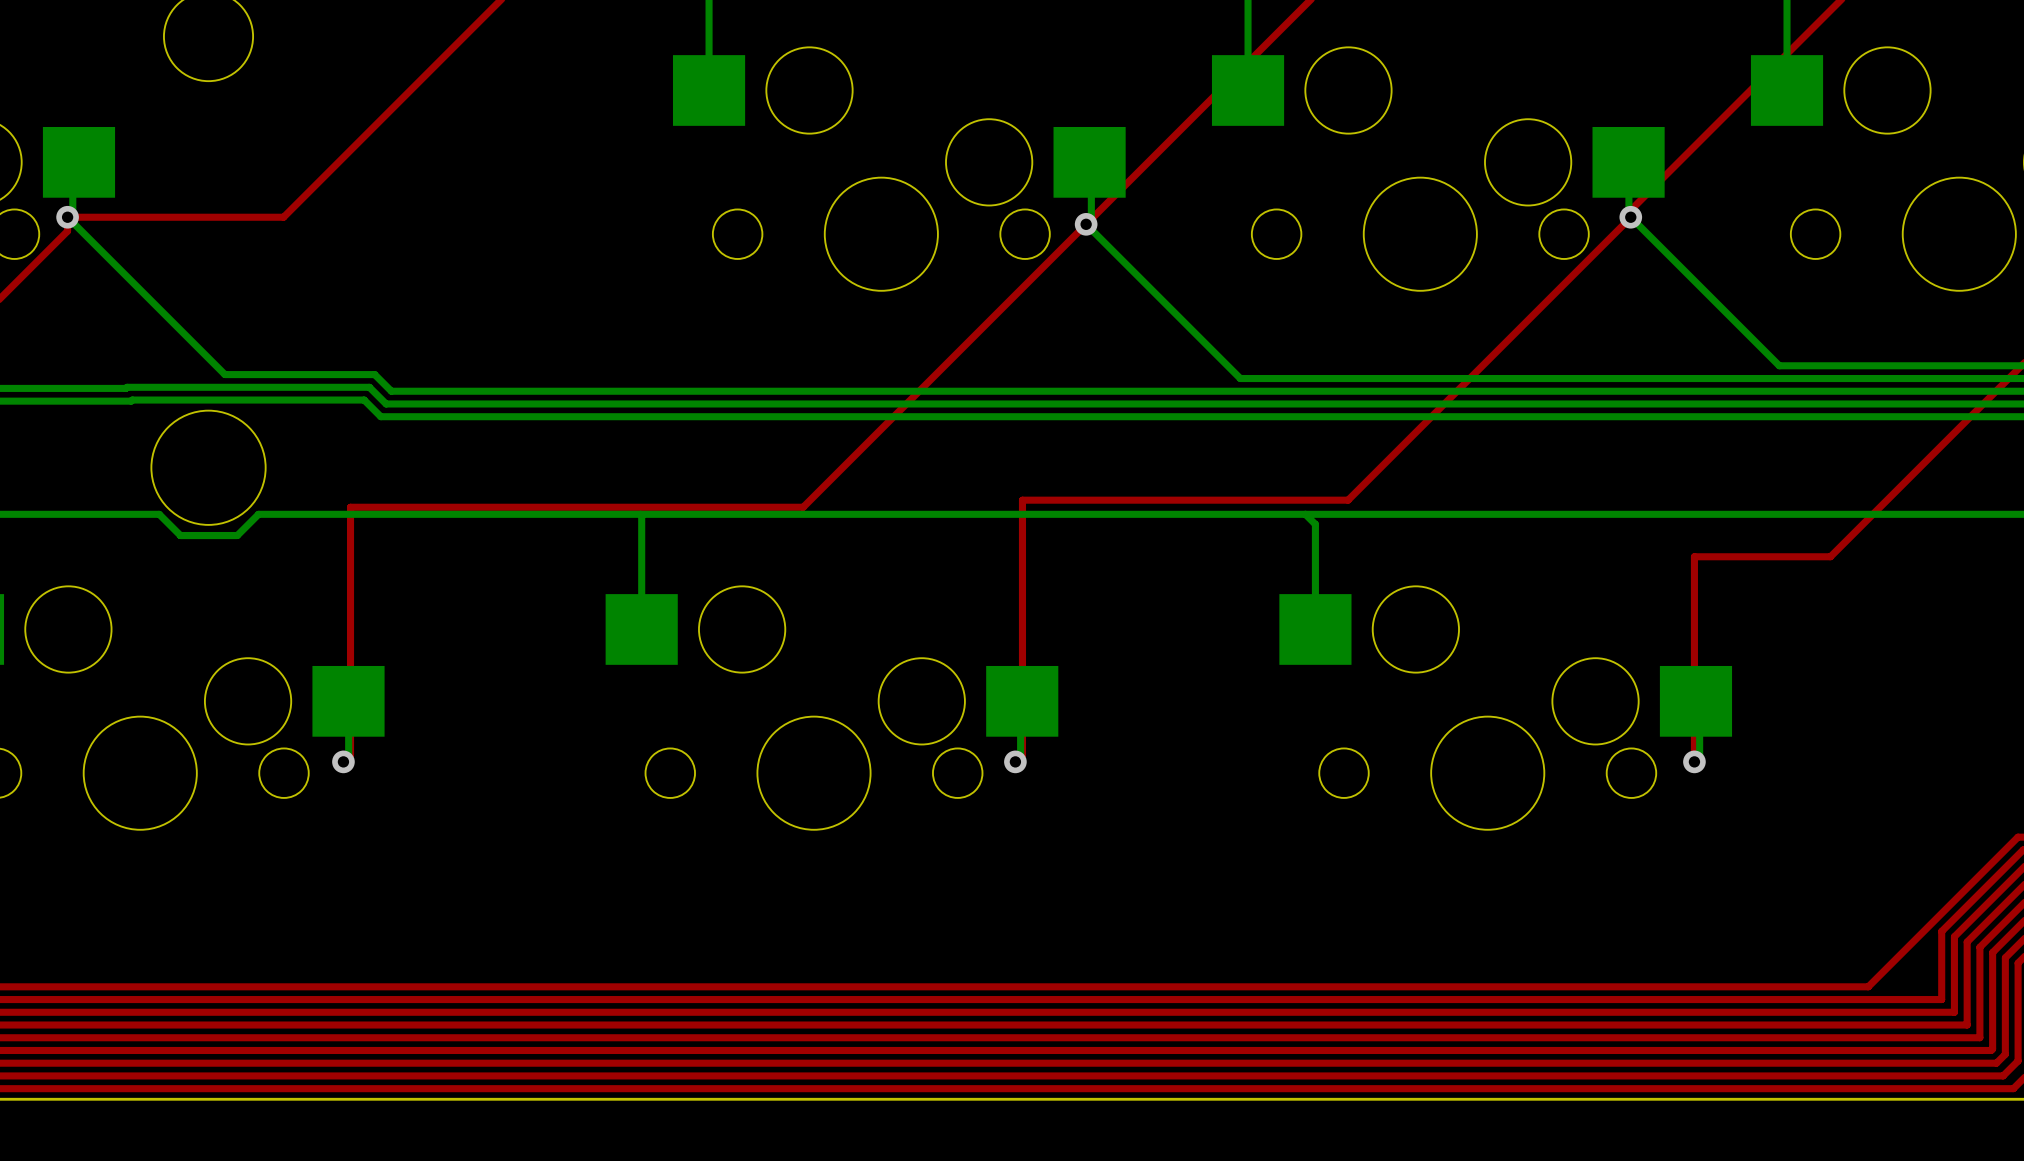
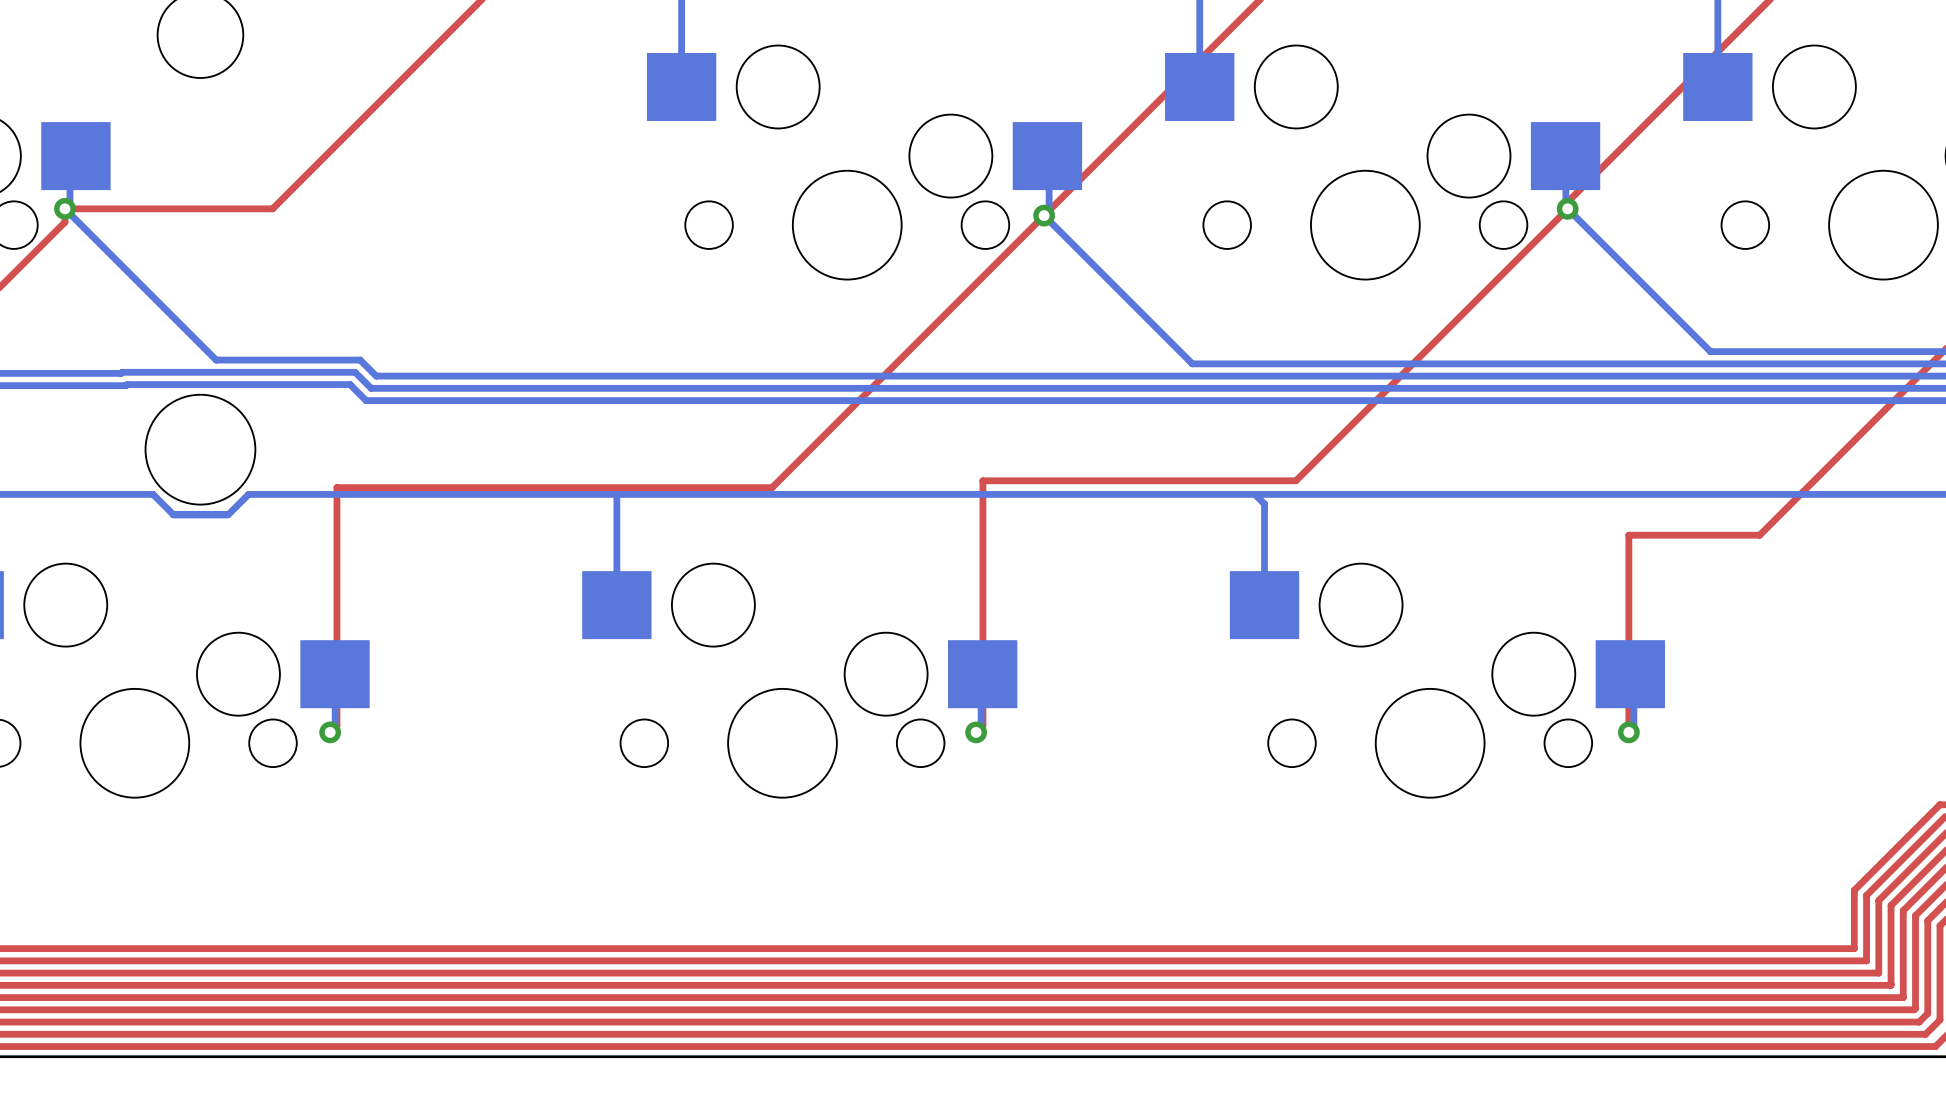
top track: (1928, 926) (1868, 986) -> (1854, 890) (1854, 948) (1796, 948)

